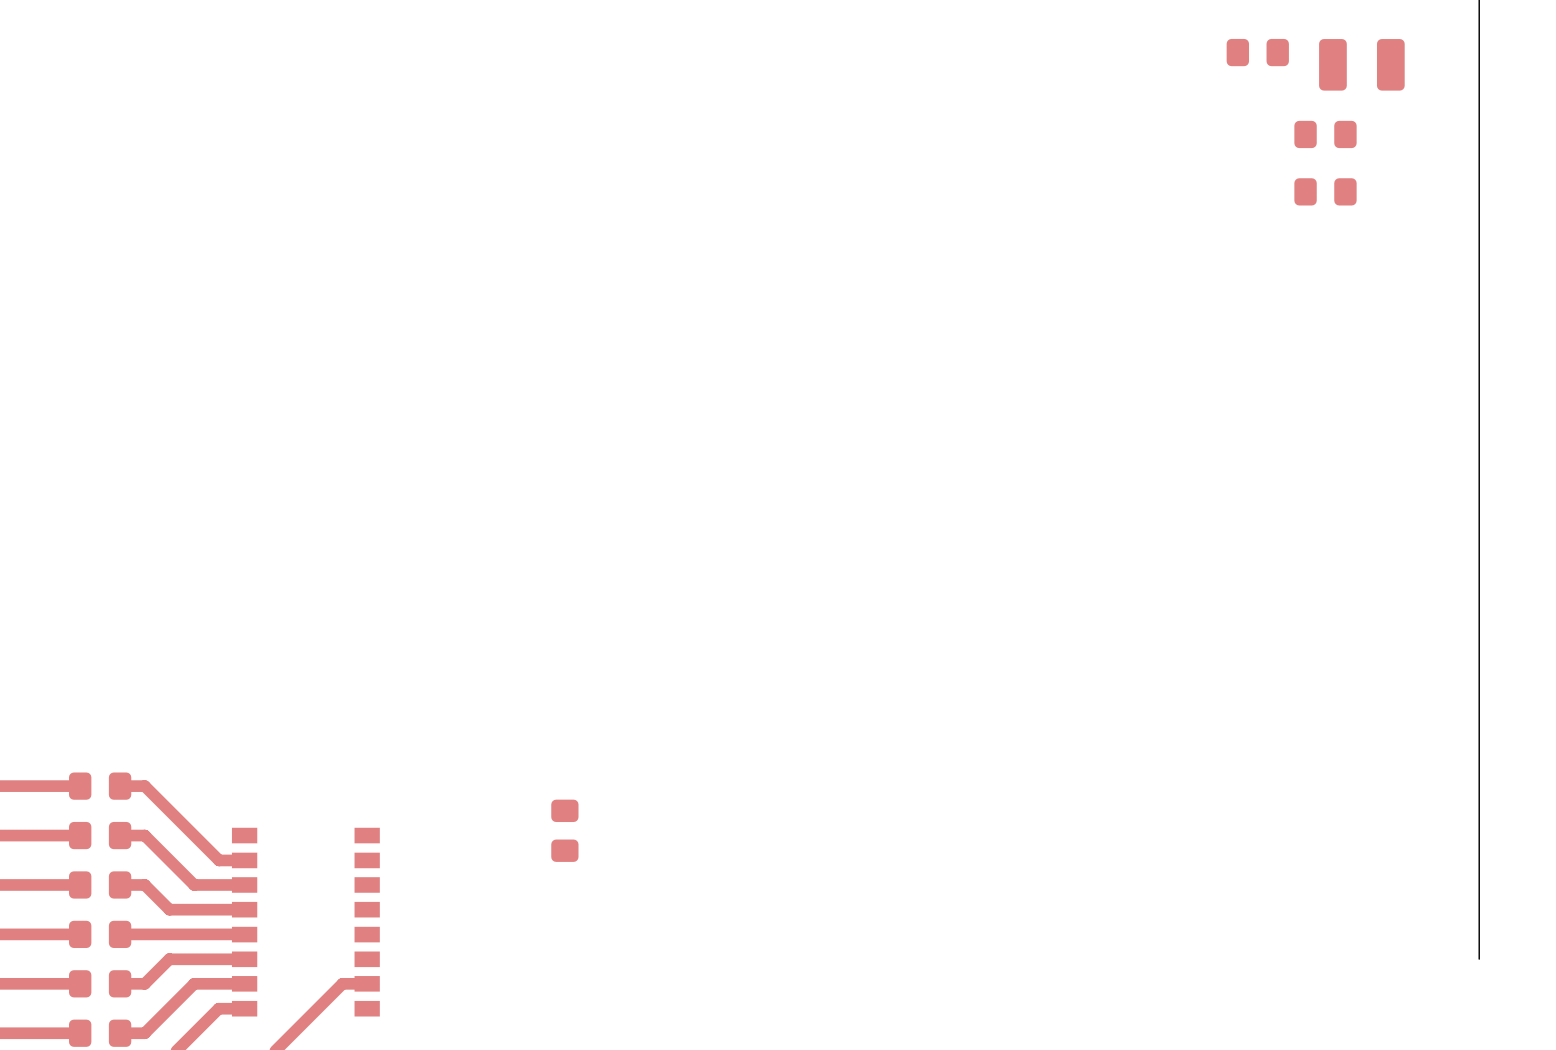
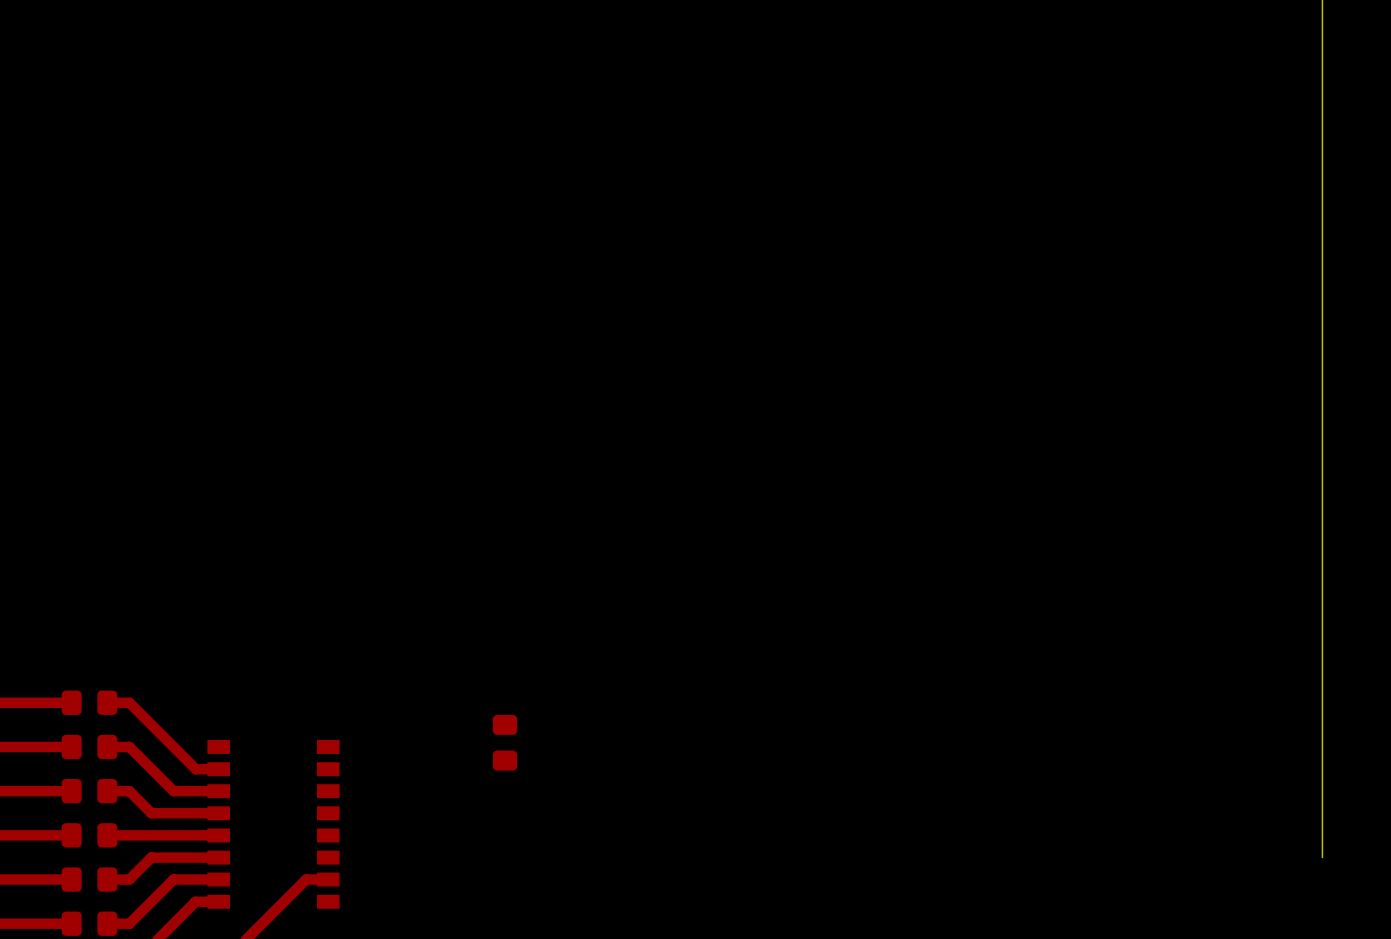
part: (1257, 52) -> none
part: (1361, 64) -> none
part: (1325, 134) -> none
part: (1325, 191) -> none

